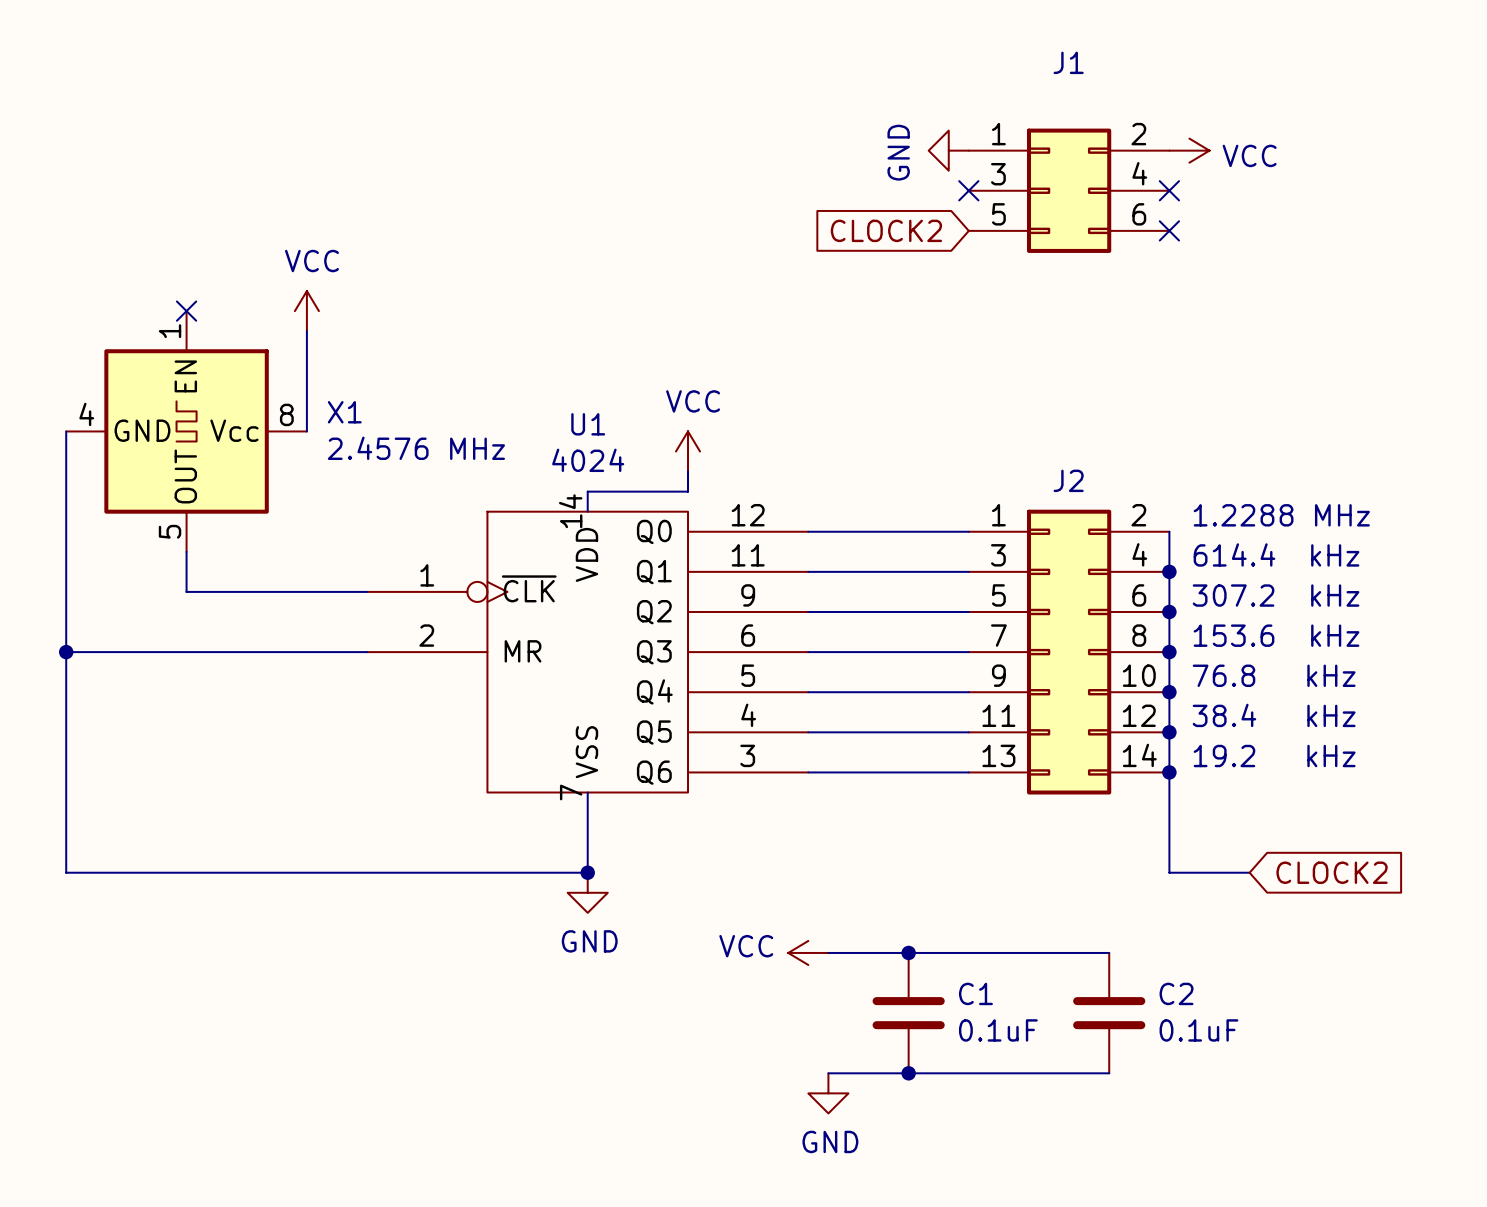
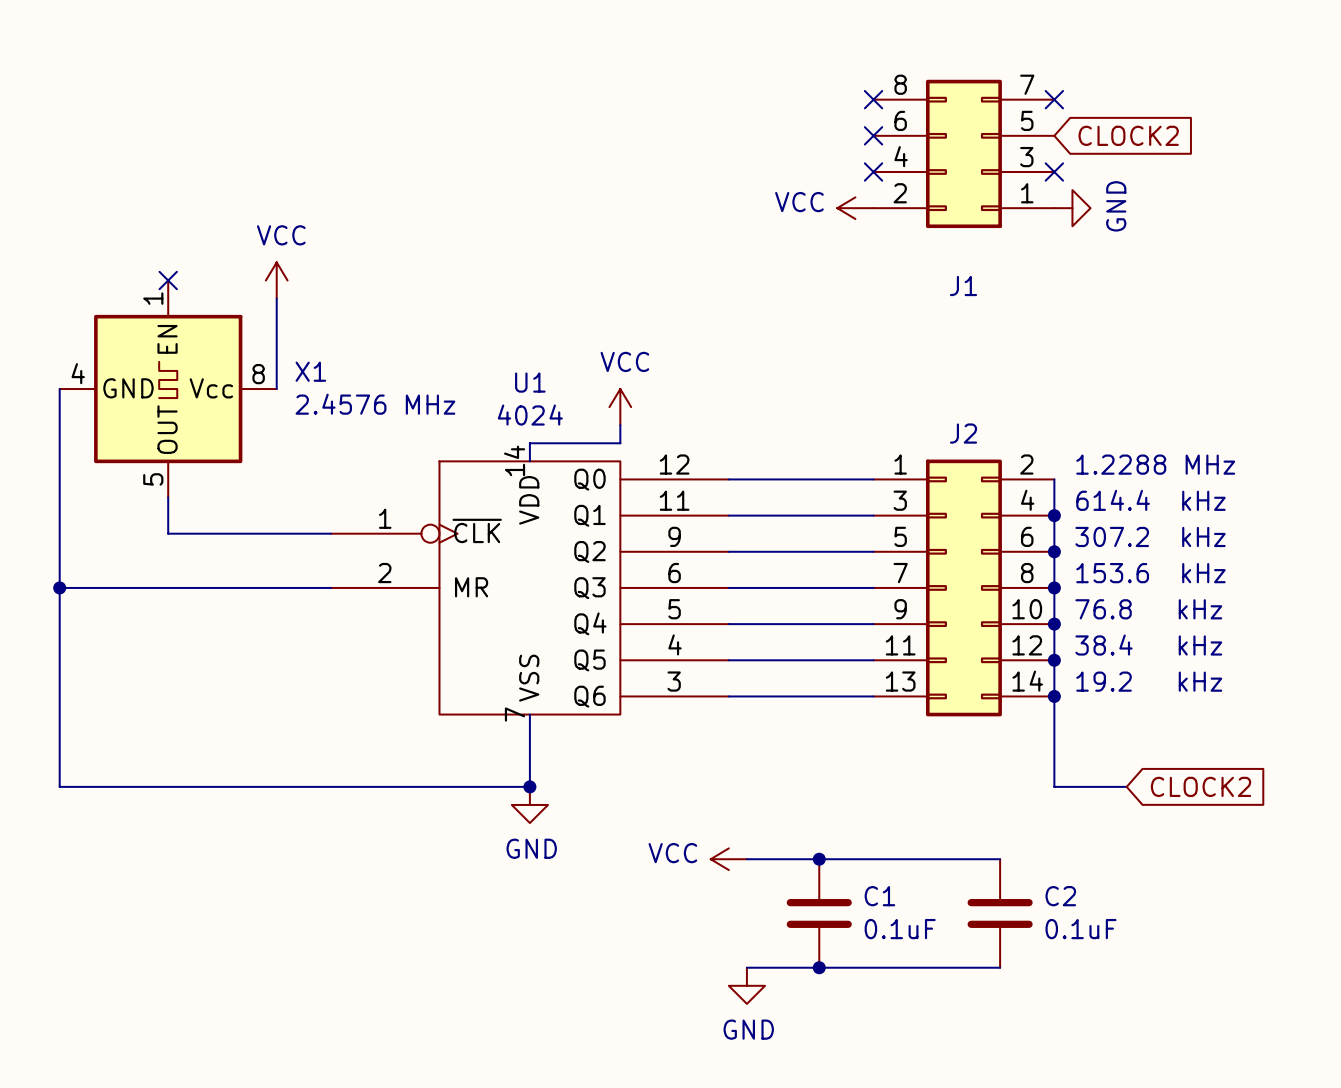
J1 name position: J1 (1068, 62) -> J1 (963, 285)
no-connect mark: none -> (873, 99)
no-connect mark: none -> (1054, 99)
J1 symbol: [968, 128, 1170, 253] -> [873, 79, 1055, 229]
power symbol rotation: 0° (948, 150) -> 180° (1072, 208)
power symbol position: GND (948, 150) -> GND (1072, 208)
no-connect mark: none -> (873, 135)
power symbol rotation: 0° (1189, 150) -> 180° (855, 208)
power symbol position: VCC (1189, 150) -> VCC (855, 208)
global label rotation: 0° (886, 230) -> 180° (1128, 135)
global label position: CLOCK2 (886, 230) -> CLOCK2 (1128, 135)
no-connect mark: (1169, 230) -> none

